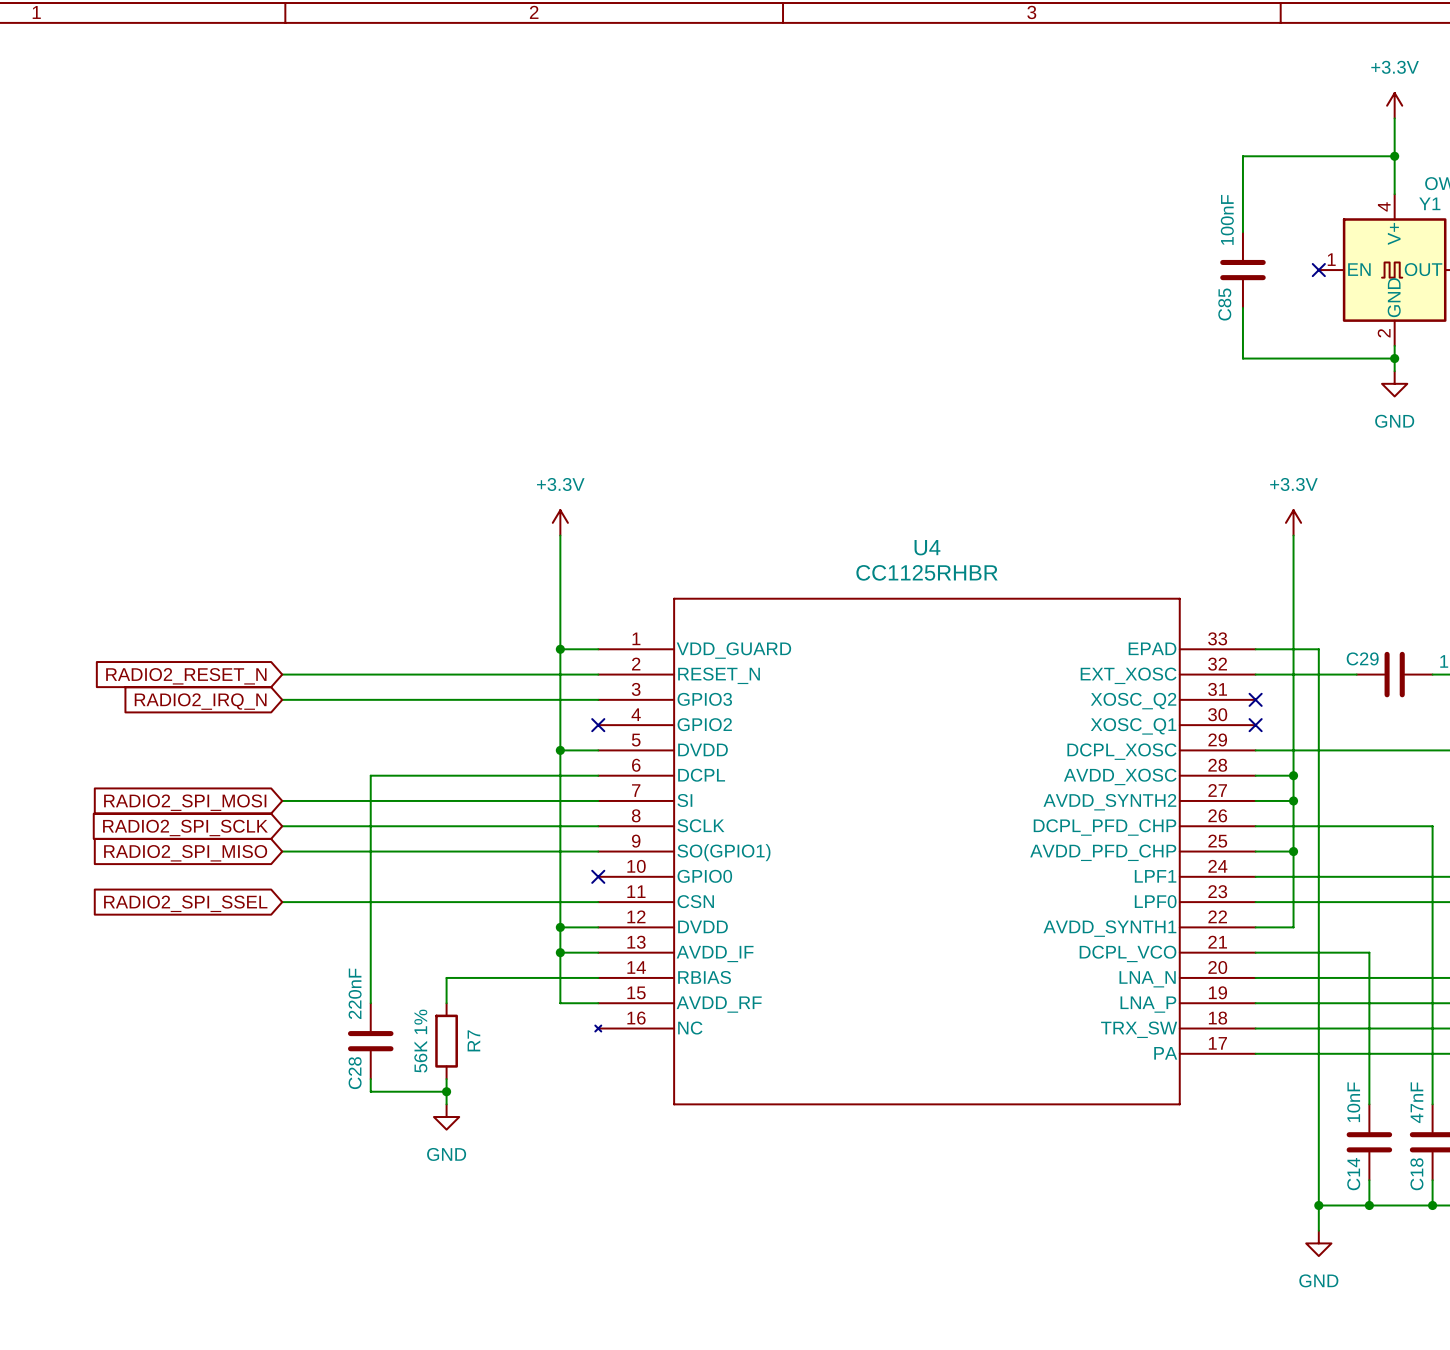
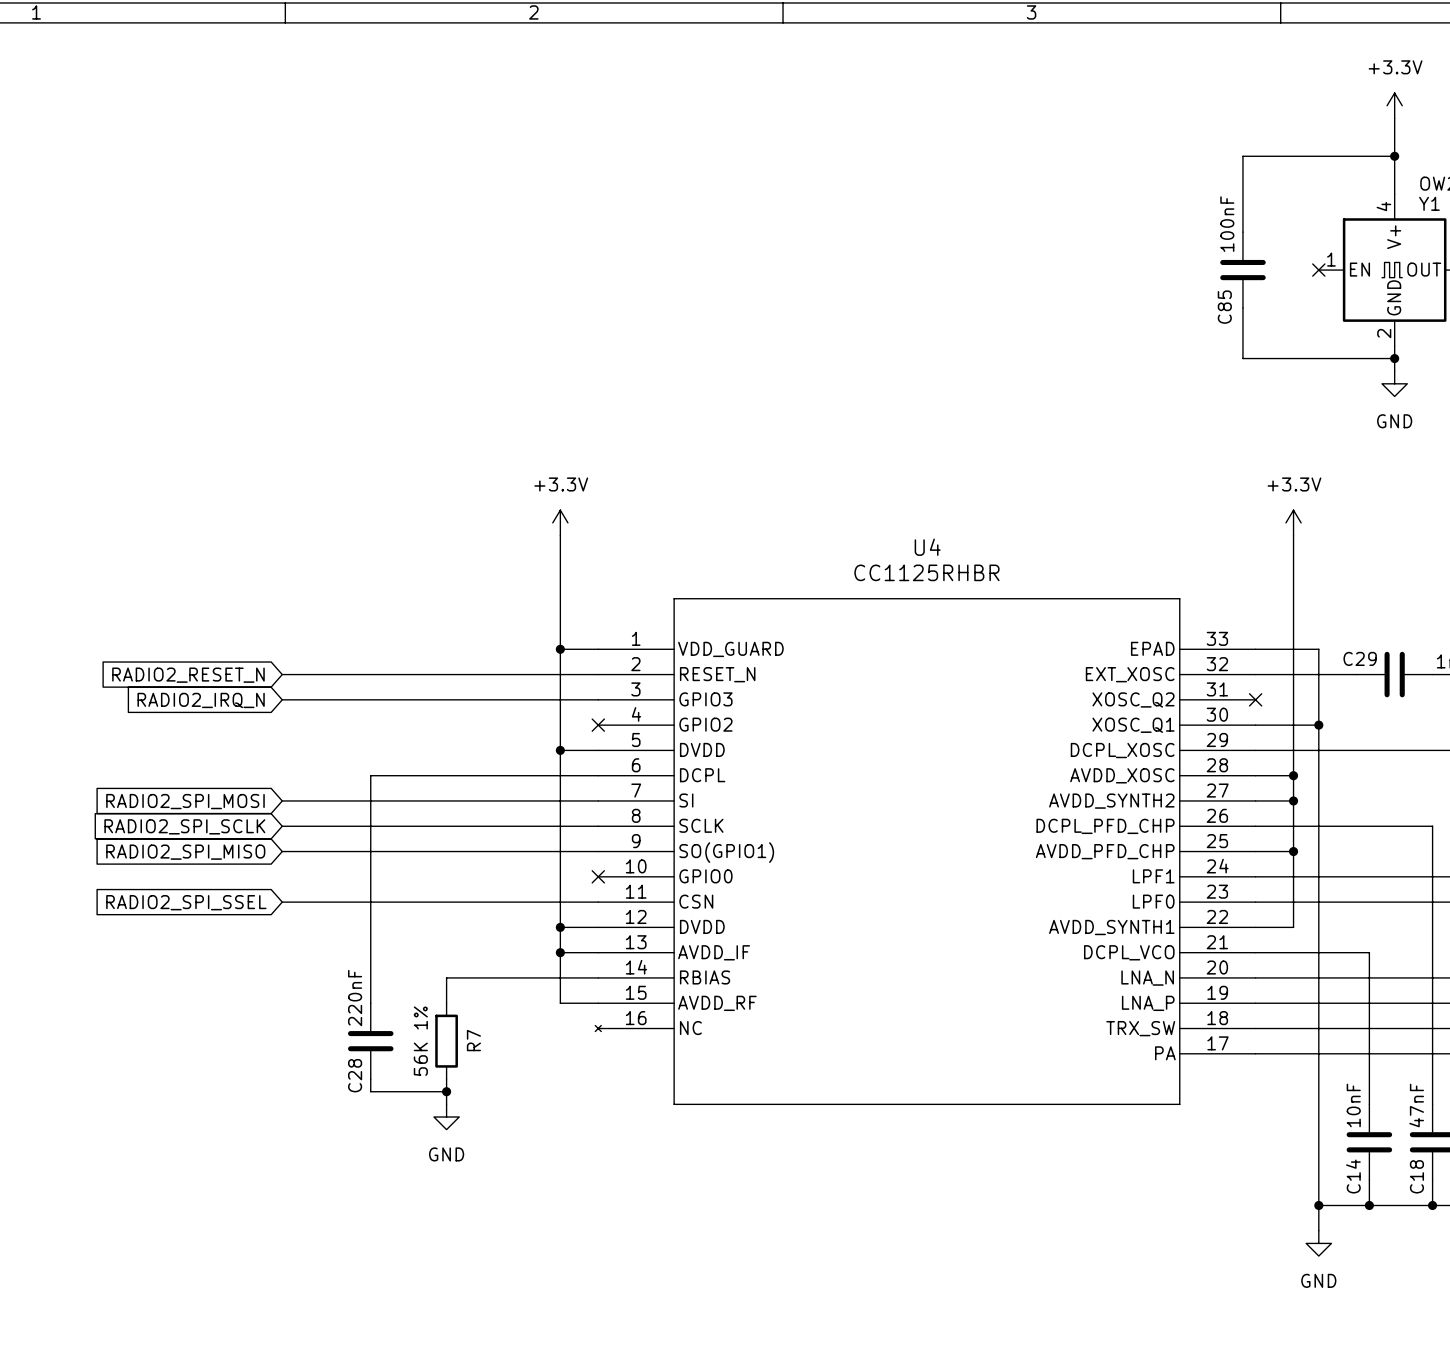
wire: none -> (1255, 725) (1318, 725)
no-connect mark: (1255, 725) -> none
junction: none -> (1318, 725)

